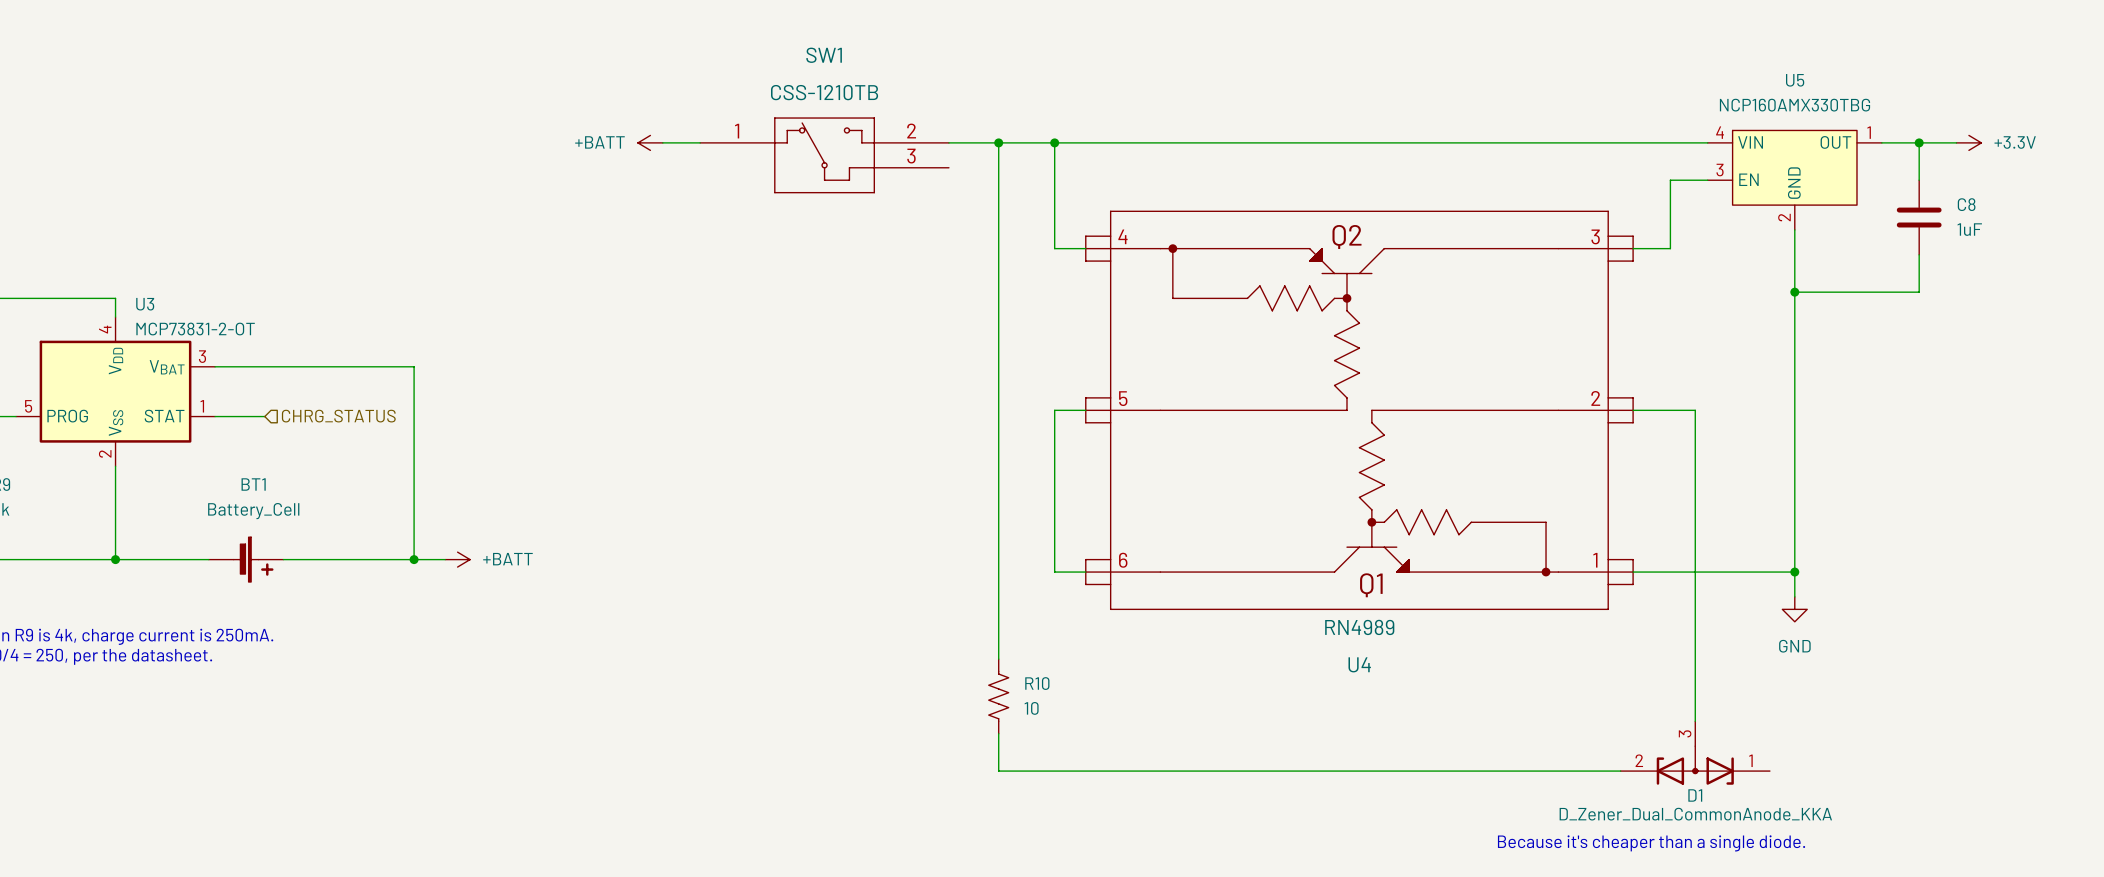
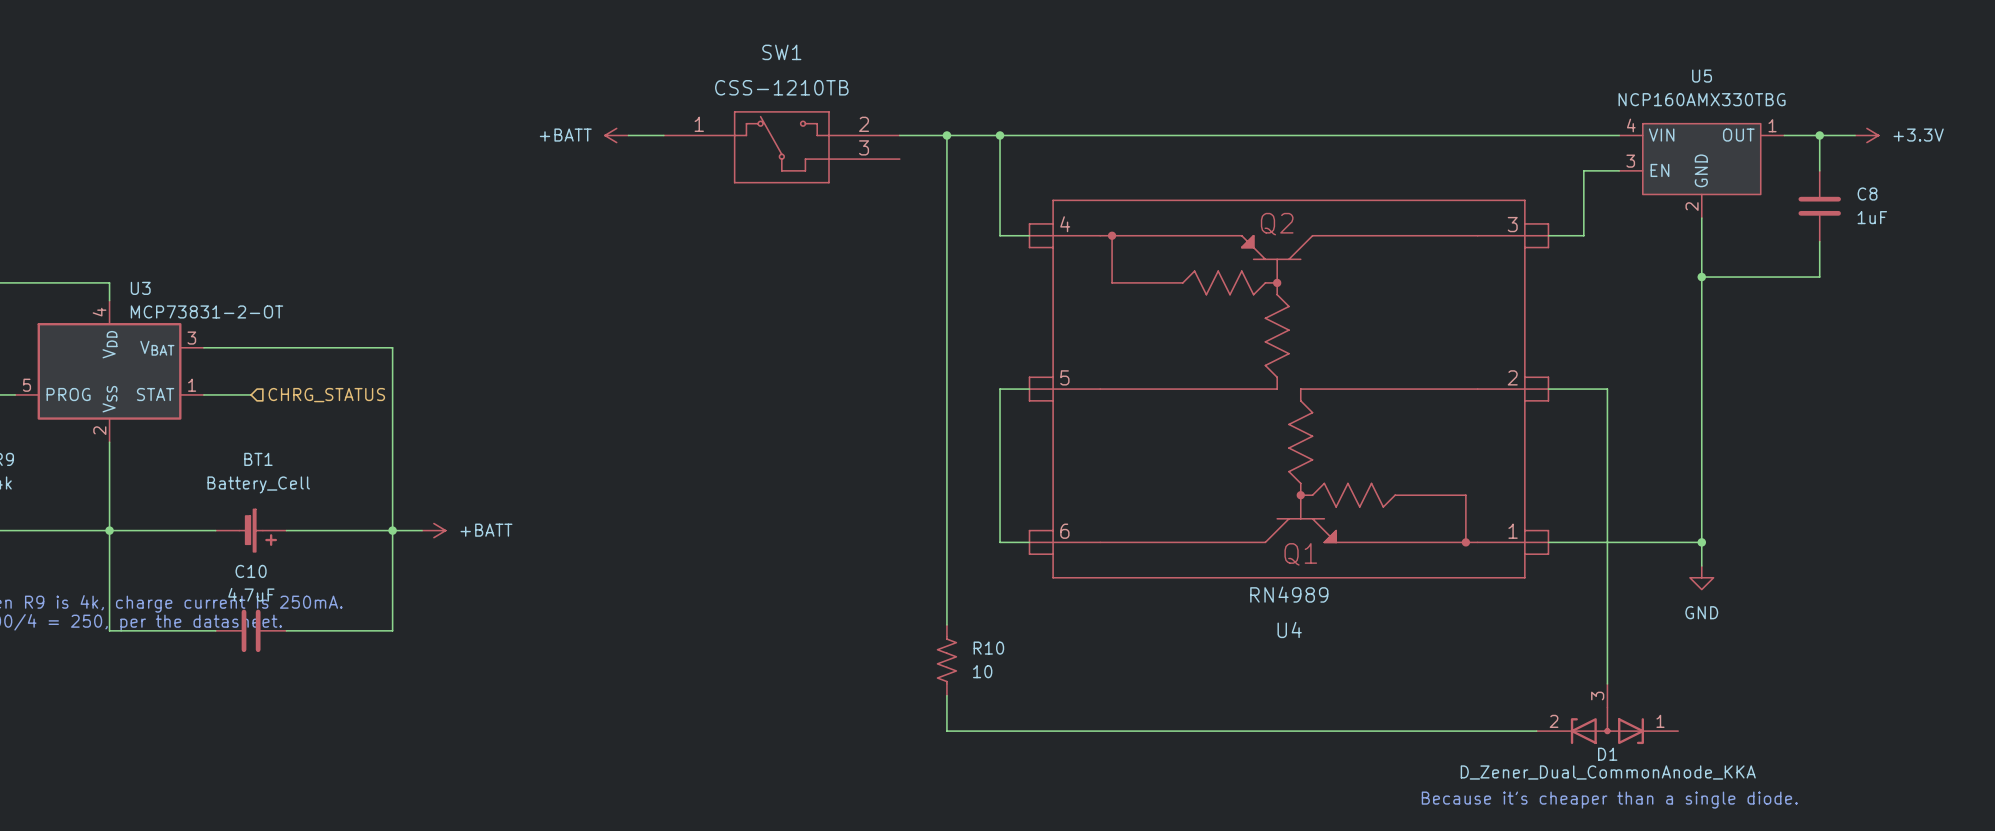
wire: none -> (109, 530) (109, 630) (215, 630)
BT1 position: (246, 559) -> (251, 530)
wire: none -> (392, 530) (392, 630) (286, 630)
C10: none -> 4.7uF (251, 630)

